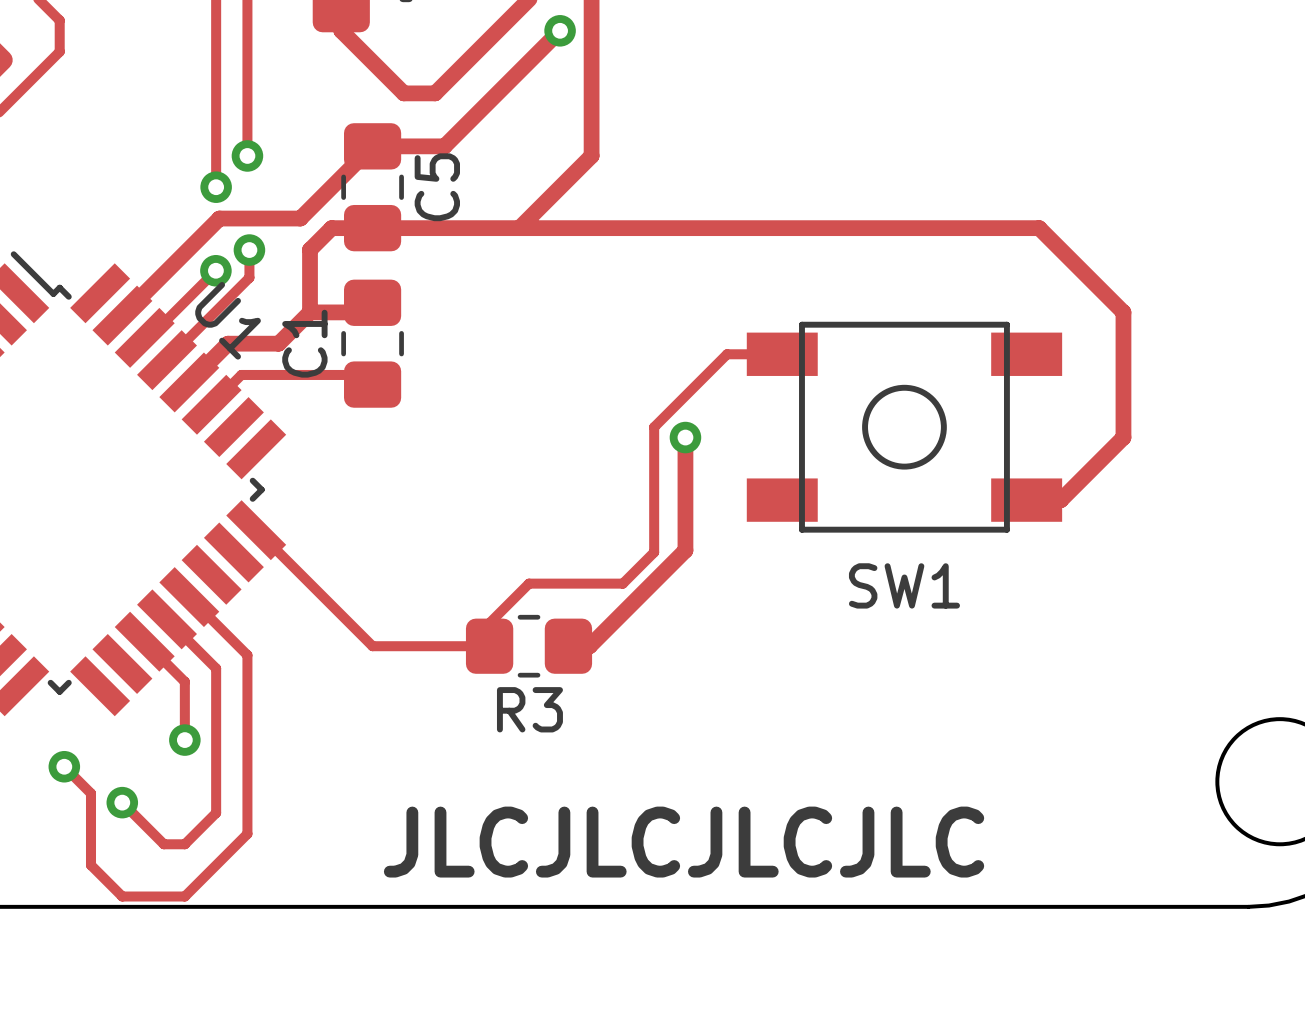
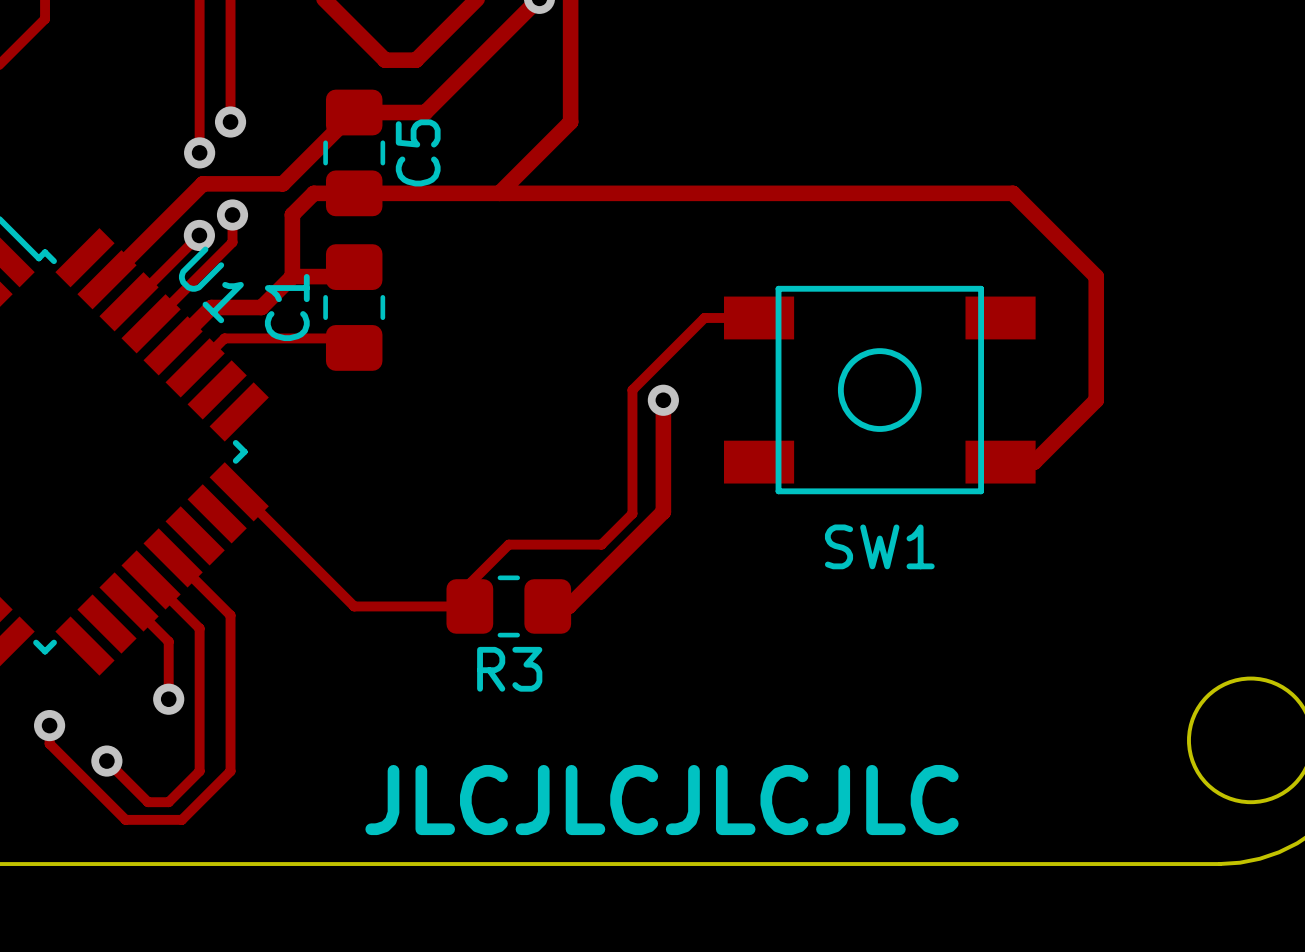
track: (64, 766) (90, 793) (90, 865) (122, 896) (184, 896) (247, 833) (247, 812) -> (49, 725) (49, 743) (125, 819) (181, 819) (230, 771)

